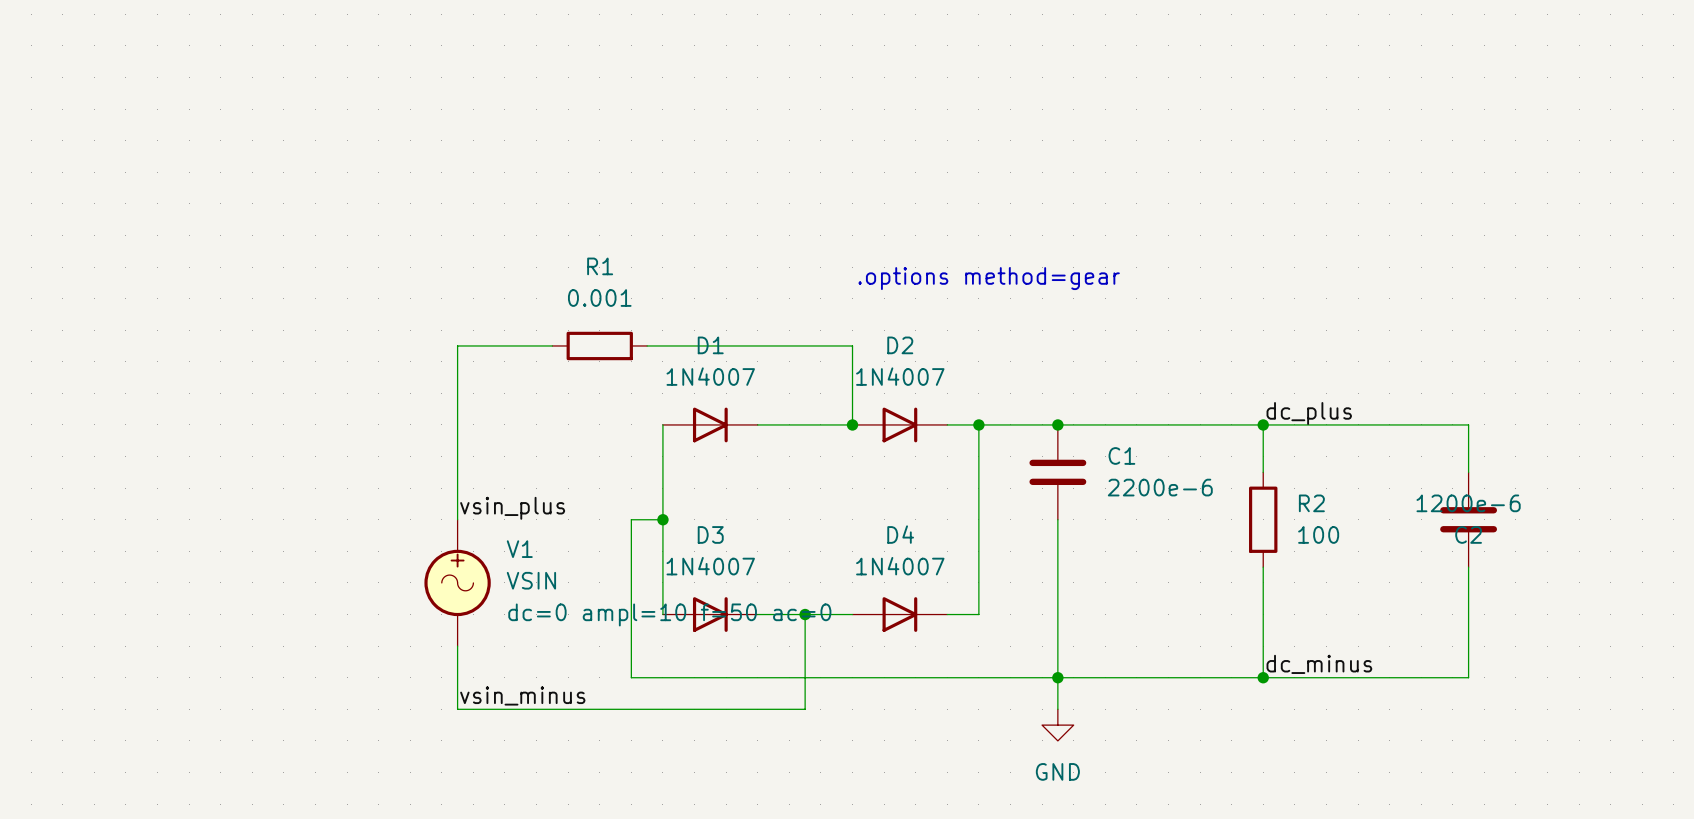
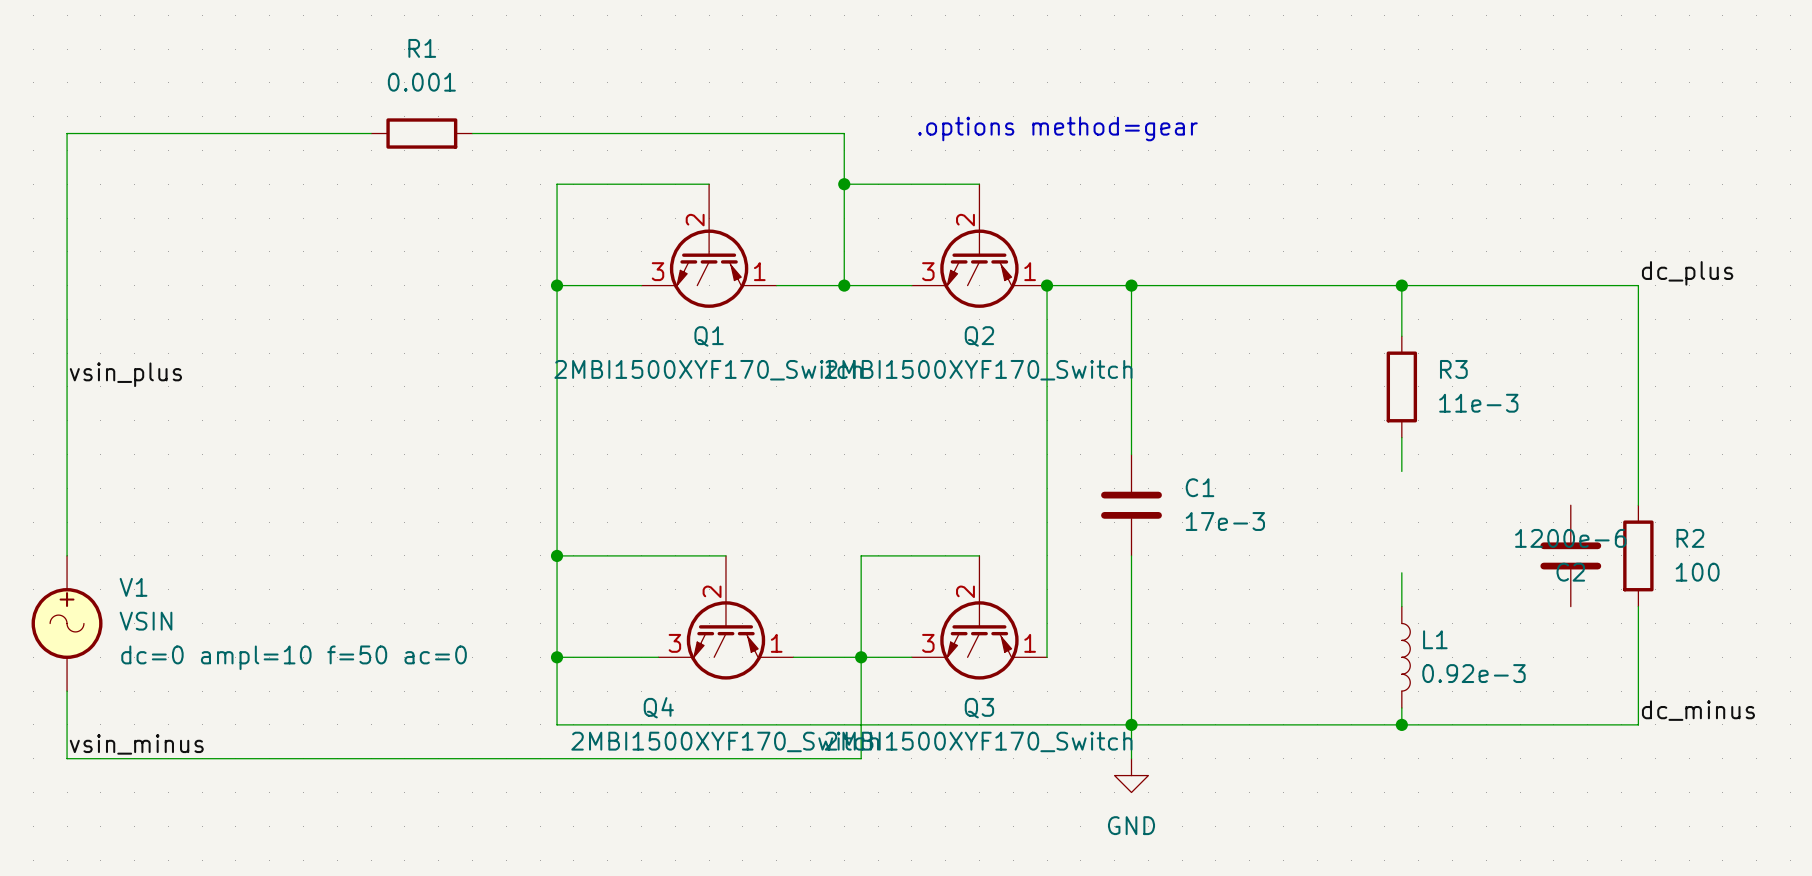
wire: none -> (371, 133) (67, 133) (67, 555)
wire: none -> (472, 133) (844, 133) (844, 285)
wire: none -> (709, 184) (557, 184) (557, 724) (675, 724)
wire: none -> (844, 184) (979, 184)
junction: none -> (844, 184)
Q1: none -> 2MBI1500XYF170_Switch (709, 246)
Q2: none -> 2MBI1500XYF170_Switch (979, 246)
label: none -> dc_plus (1687, 273)
wire: none -> (557, 285) (641, 285)
junction: none -> (557, 285)
wire: none -> (776, 285) (911, 285)
junction: none -> (844, 285)
junction: none -> (1047, 285)
wire: none -> (1131, 285) (1131, 454)
junction: none -> (1131, 285)
junction: none -> (1401, 285)
text position: .options method=gear (989, 278) -> .options method=gear (1057, 129)
wire: (552, 345) (457, 345) (457, 519) -> none
R1 position: (599, 345) -> (421, 133)
wire: (647, 345) (852, 345) (852, 424) (757, 424) -> none
label: none -> vsin_plus (125, 374)
R3: none -> 11e-3 (1401, 386)
wire: none -> (1401, 437) (1401, 471)
label: dc_plus (1309, 413) -> none
wire: (662, 424) (662, 614) -> none
D1: 1N4007 (710, 424) -> none
junction: (852, 424) -> none
D2: 1N4007 (899, 424) -> none
wire: (947, 424) (1468, 424) (1468, 472) -> none
wire: none -> (1047, 454) (1047, 285) (1638, 285) (1638, 505)
junction: (978, 424) -> none
junction: (1057, 424) -> none
wire: (1263, 424) (1263, 472) -> (1401, 285) (1401, 336)
junction: (1263, 424) -> none
C1 value: 2200e-6 (1160, 487) -> 17e-3 (1225, 521)
label: vsin_plus (512, 508) -> none
junction: none -> (557, 555)
wire: (631, 519) (631, 677) -> (675, 555) (557, 555)
wire: none -> (709, 555) (725, 555)
junction: (662, 519) -> none
wire: none -> (979, 555) (861, 555) (861, 657)
R2 position: (1263, 519) -> (1638, 555)
wire: none -> (1401, 572) (1401, 606)
wire: (1263, 567) (1263, 677) -> none
wire: (1468, 567) (1468, 677) -> (1638, 606) (1638, 724) (1570, 724)
Q4: none -> 2MBI1500XYF170_Switch (725, 617)
Q3: none -> 2MBI1500XYF170_Switch (979, 617)
V1 position: (457, 582) -> (67, 623)
wire: none -> (557, 657) (658, 657)
junction: none -> (557, 657)
D3: 1N4007 (710, 614) -> none
D4: 1N4007 (899, 614) -> none
L1: none -> 0.92e-3 (1406, 657)
wire: (457, 646) (457, 709) -> (67, 691) (67, 758) (489, 758)
wire: none -> (1401, 707) (1401, 724)
label position: dc_minus (1319, 664) -> dc_minus (1698, 710)
junction position: (1263, 677) -> (1401, 724)
label: none -> vsin_minus (136, 744)
label: vsin_minus (522, 695) -> none

